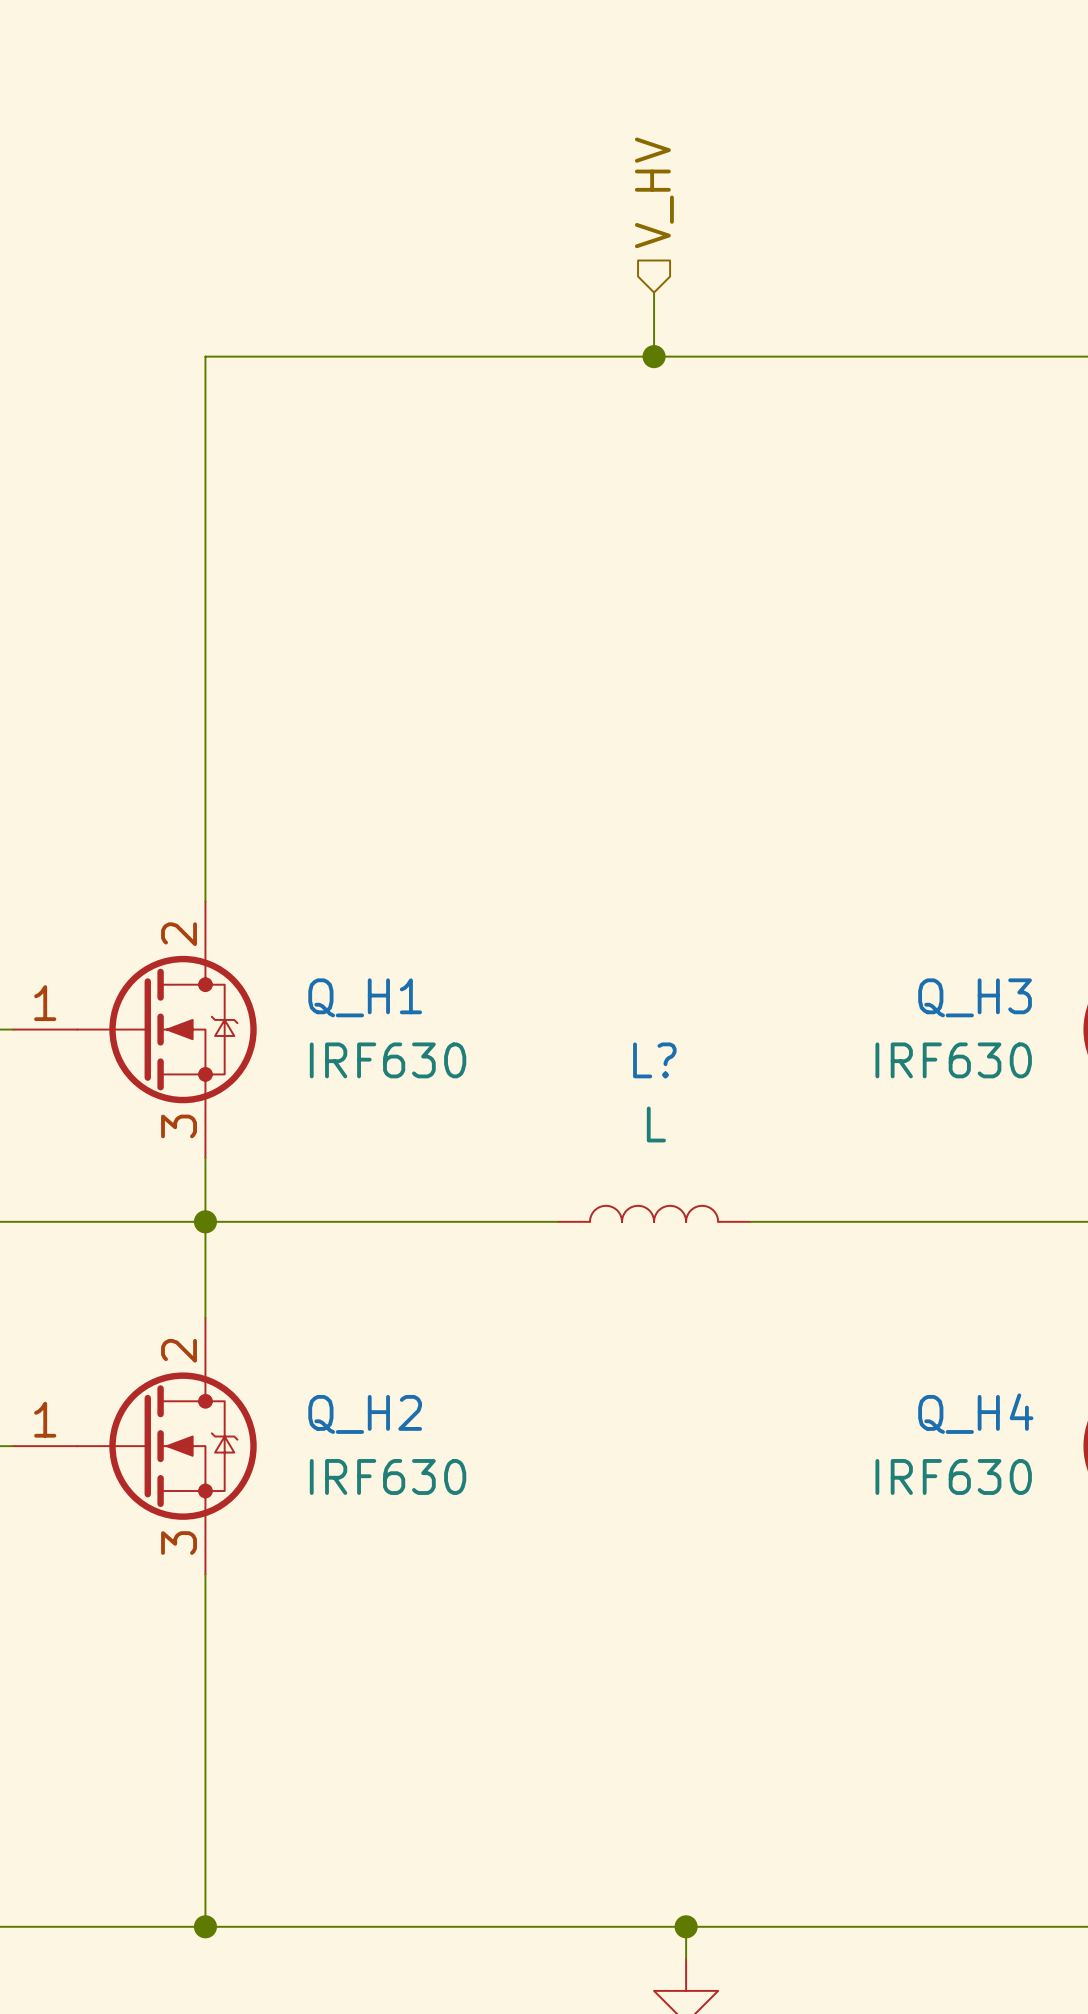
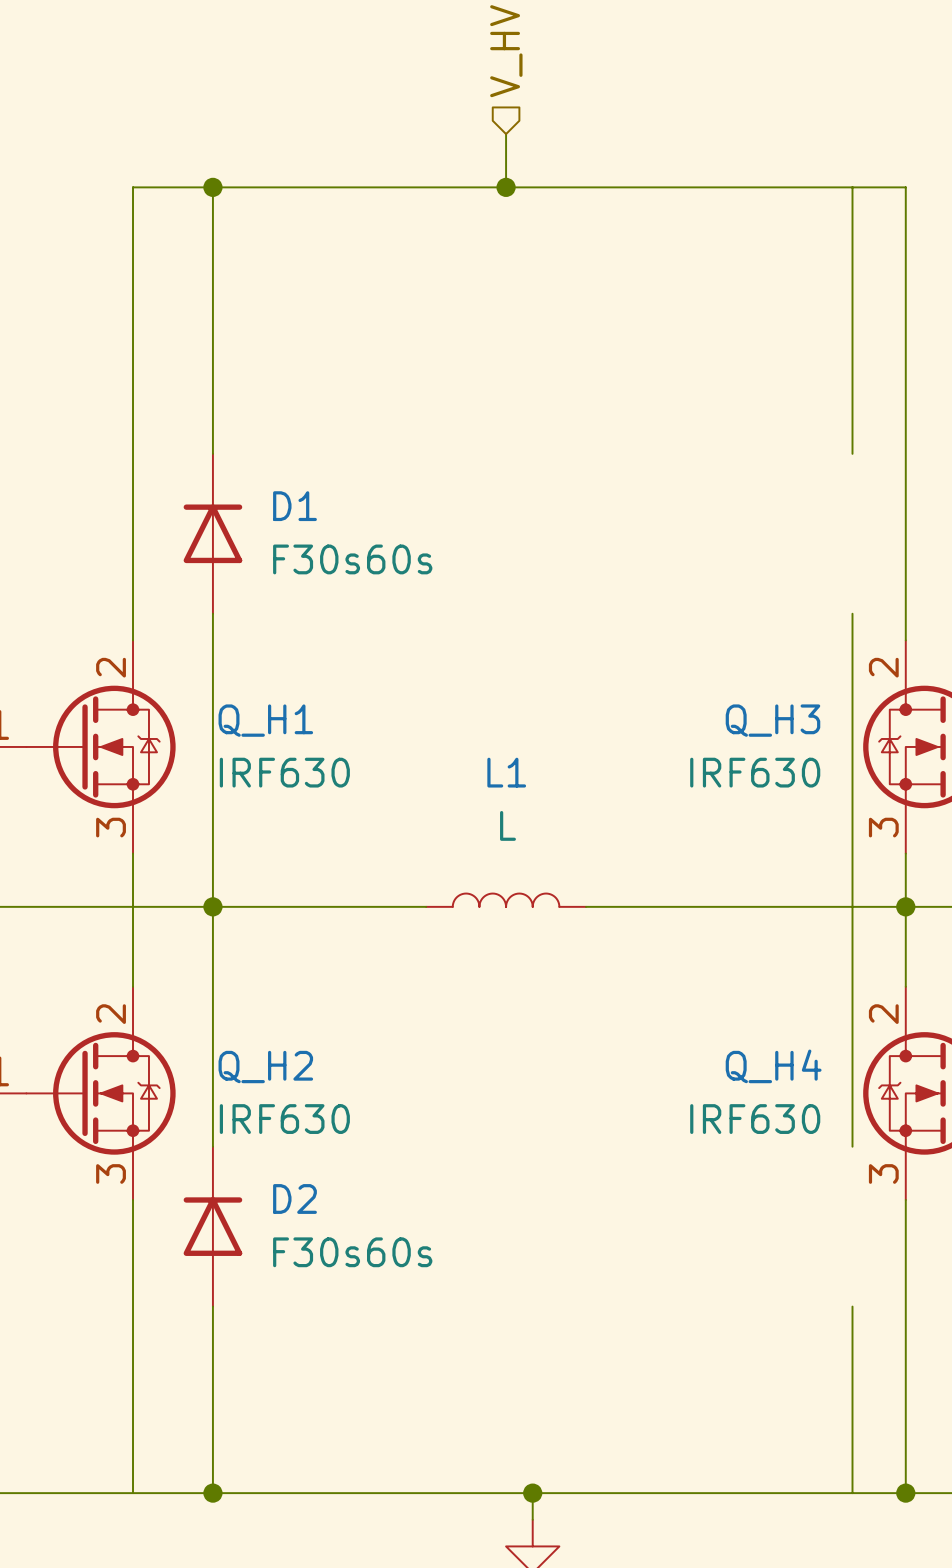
wire: none -> (212, 187) (212, 453)
junction: none -> (212, 187)
wire: none -> (852, 187) (852, 453)
D1: none -> F30s60s (212, 533)
wire: none -> (212, 613) (212, 1146)
wire: none -> (852, 613) (852, 1146)
L? name: L? (654, 1060) -> L1 (506, 772)
junction position: (205, 1221) -> (212, 906)
D2: none -> F30s60s (212, 1226)
wire: none -> (212, 1306) (212, 1493)
wire: none -> (852, 1306) (852, 1493)
junction position: (205, 1926) -> (212, 1493)

